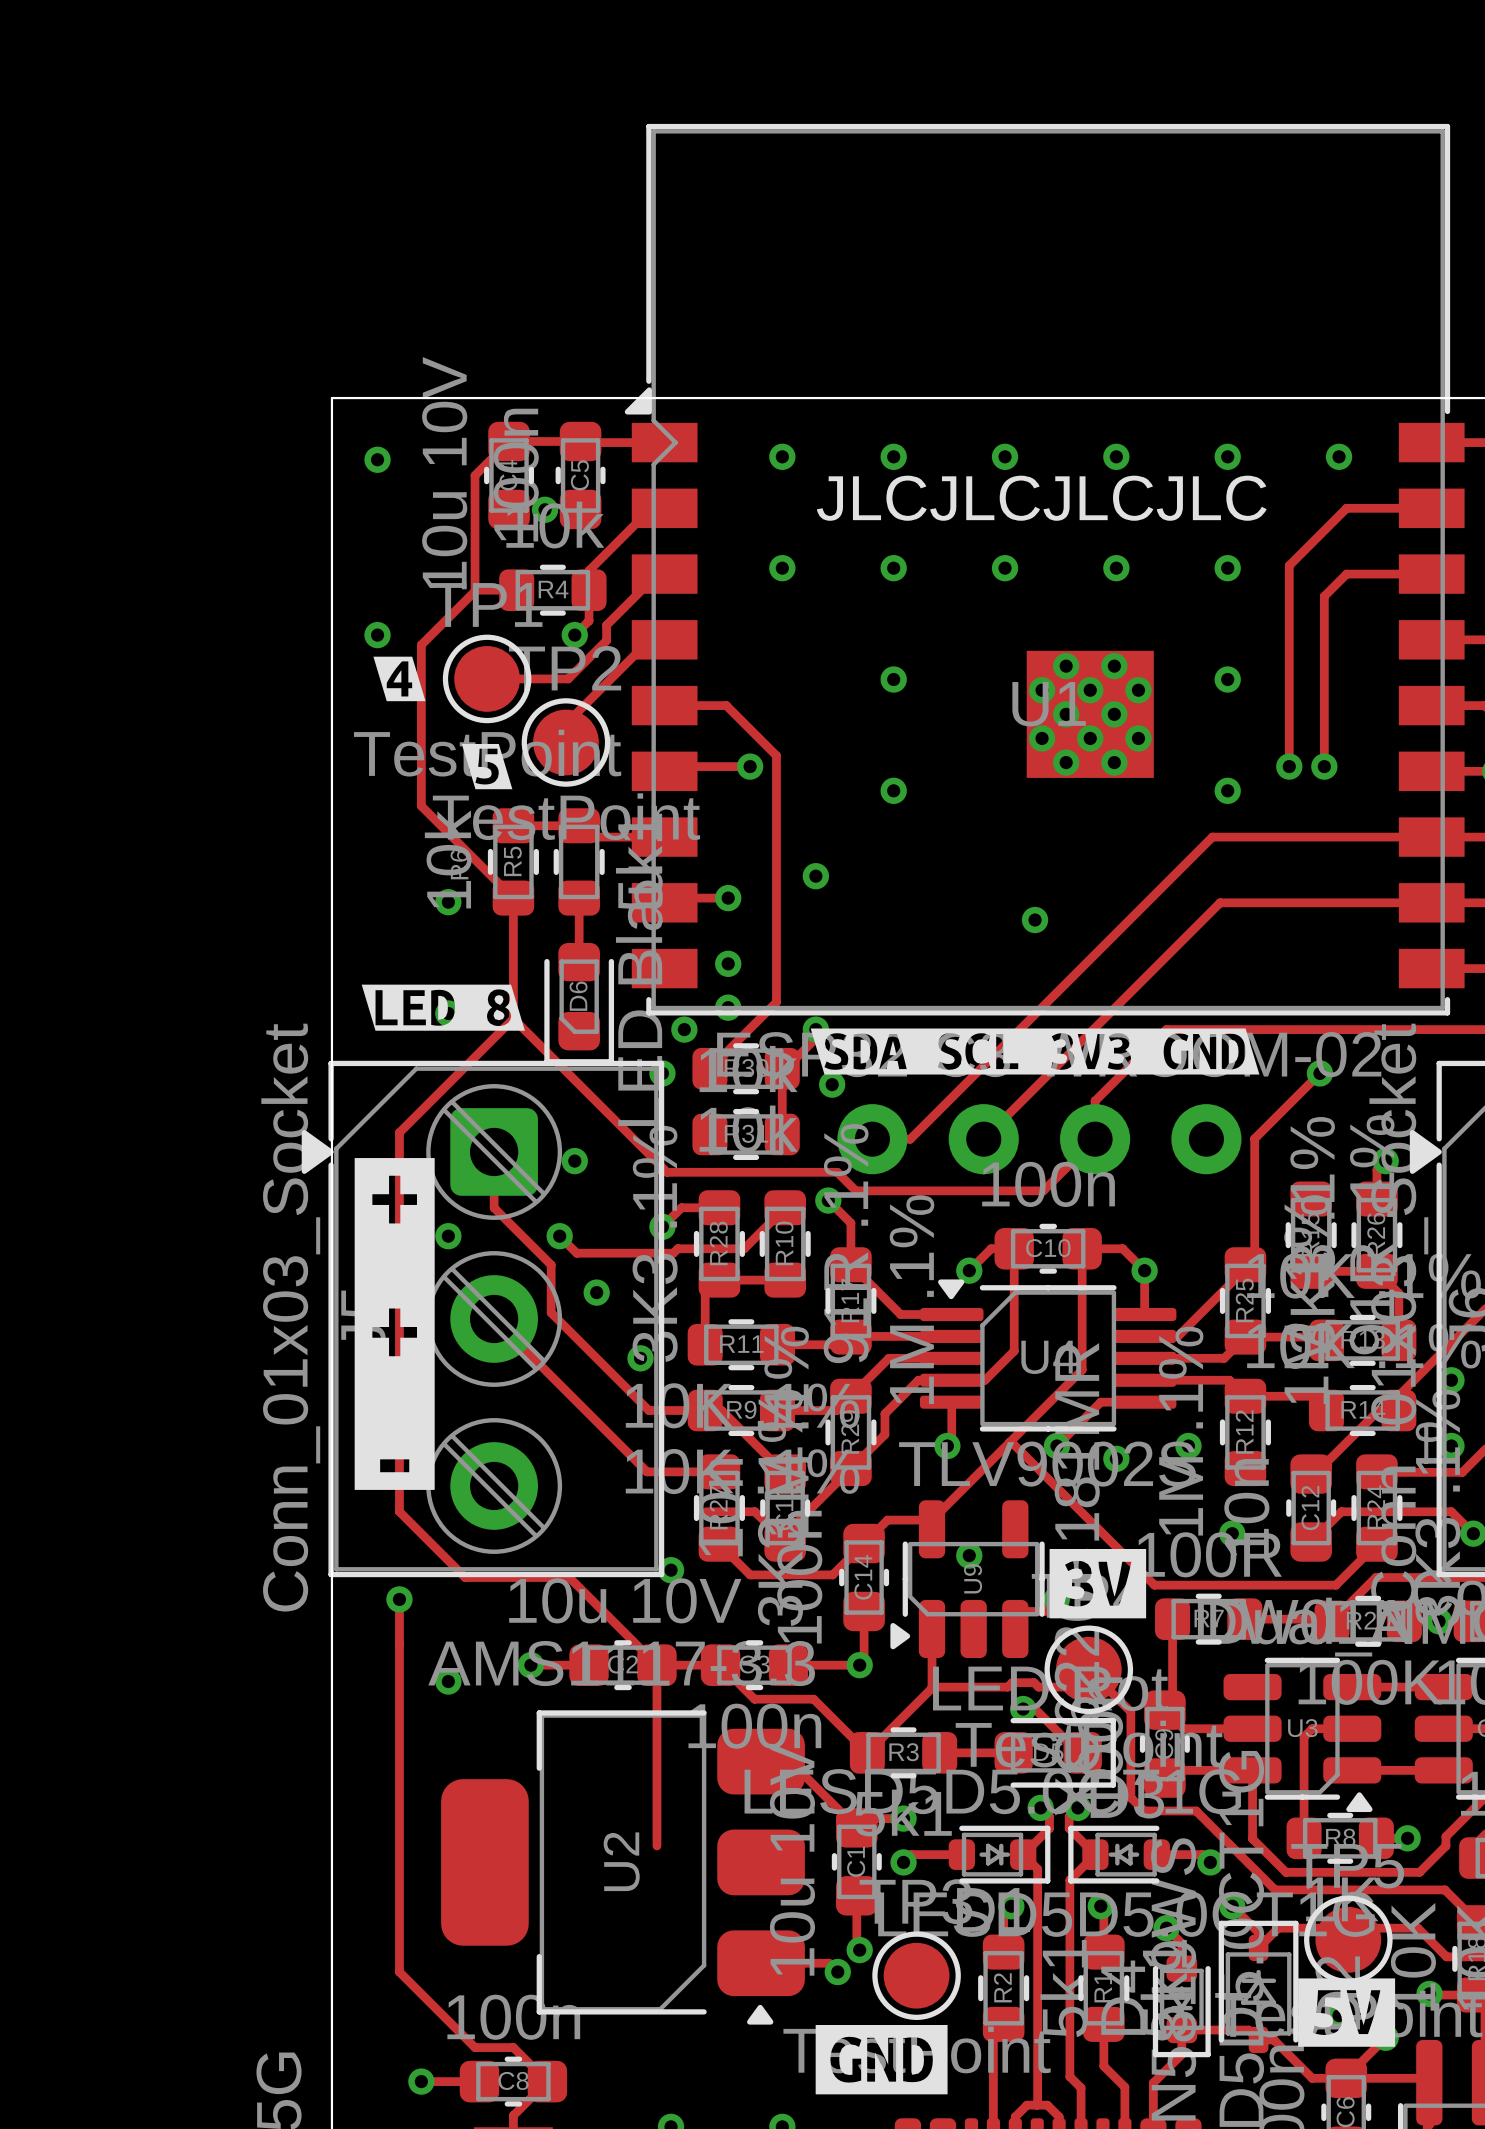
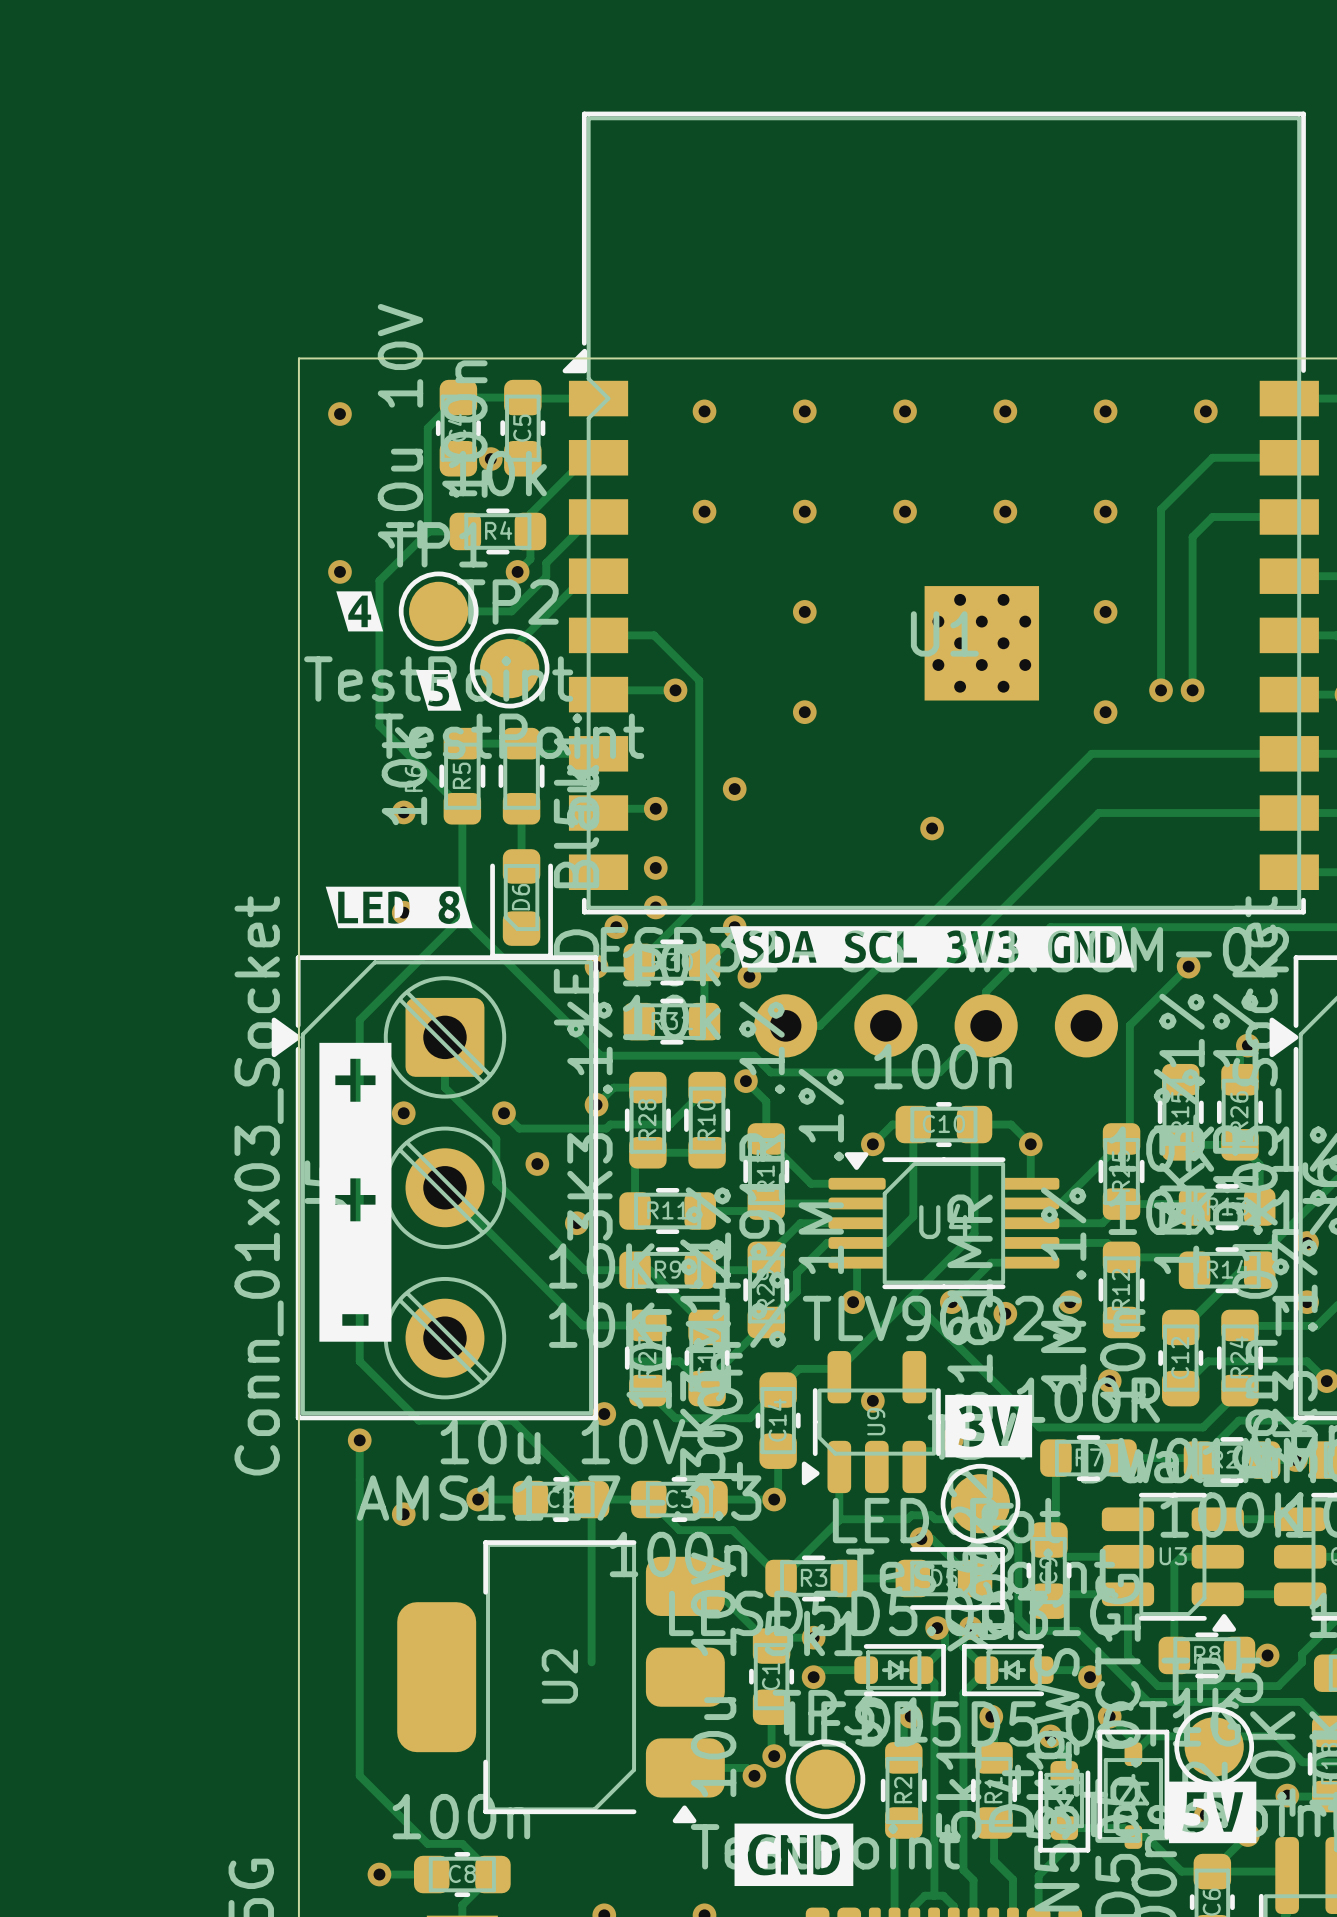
text: JLCJLCJLCJLC (1041, 498) -> none
via: (574, 1161) -> none

